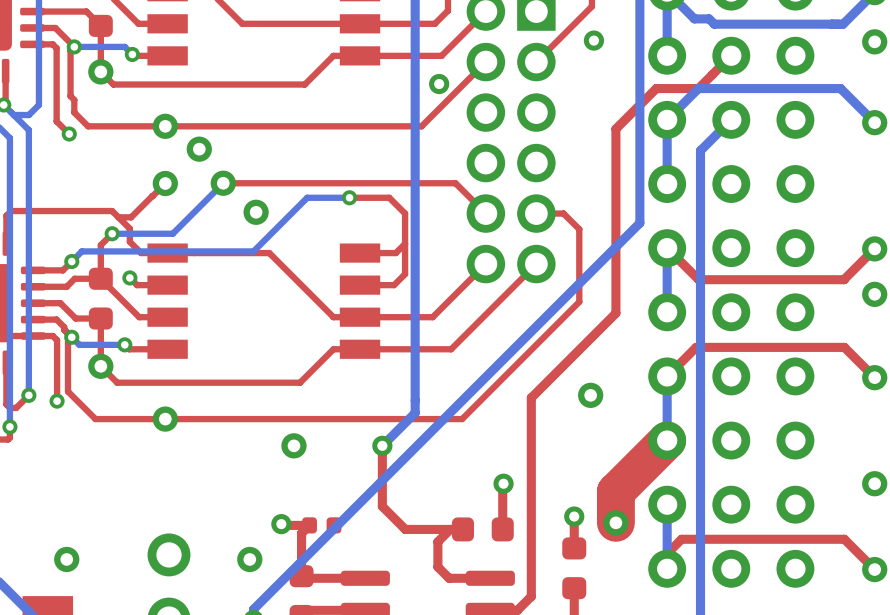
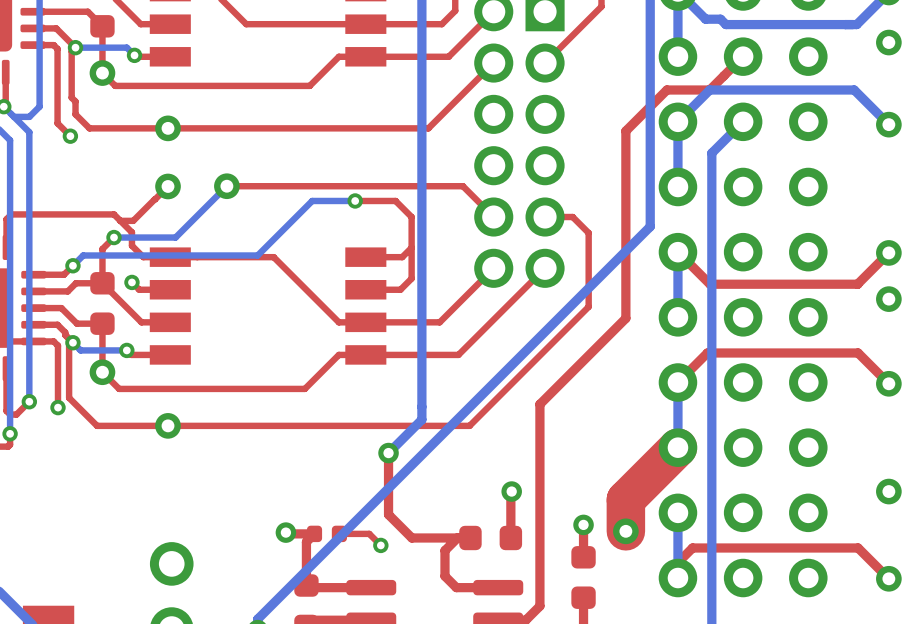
via: (593, 40) -> none
via: (439, 84) -> none
via: (199, 149) -> none
via: (256, 212) -> none
via: (590, 395) -> none
via: (293, 445) -> none
top track: none -> (339, 533) (369, 533) (380, 545)
via: none -> (380, 545)
via: (66, 559) -> none
via: (249, 559) -> none

